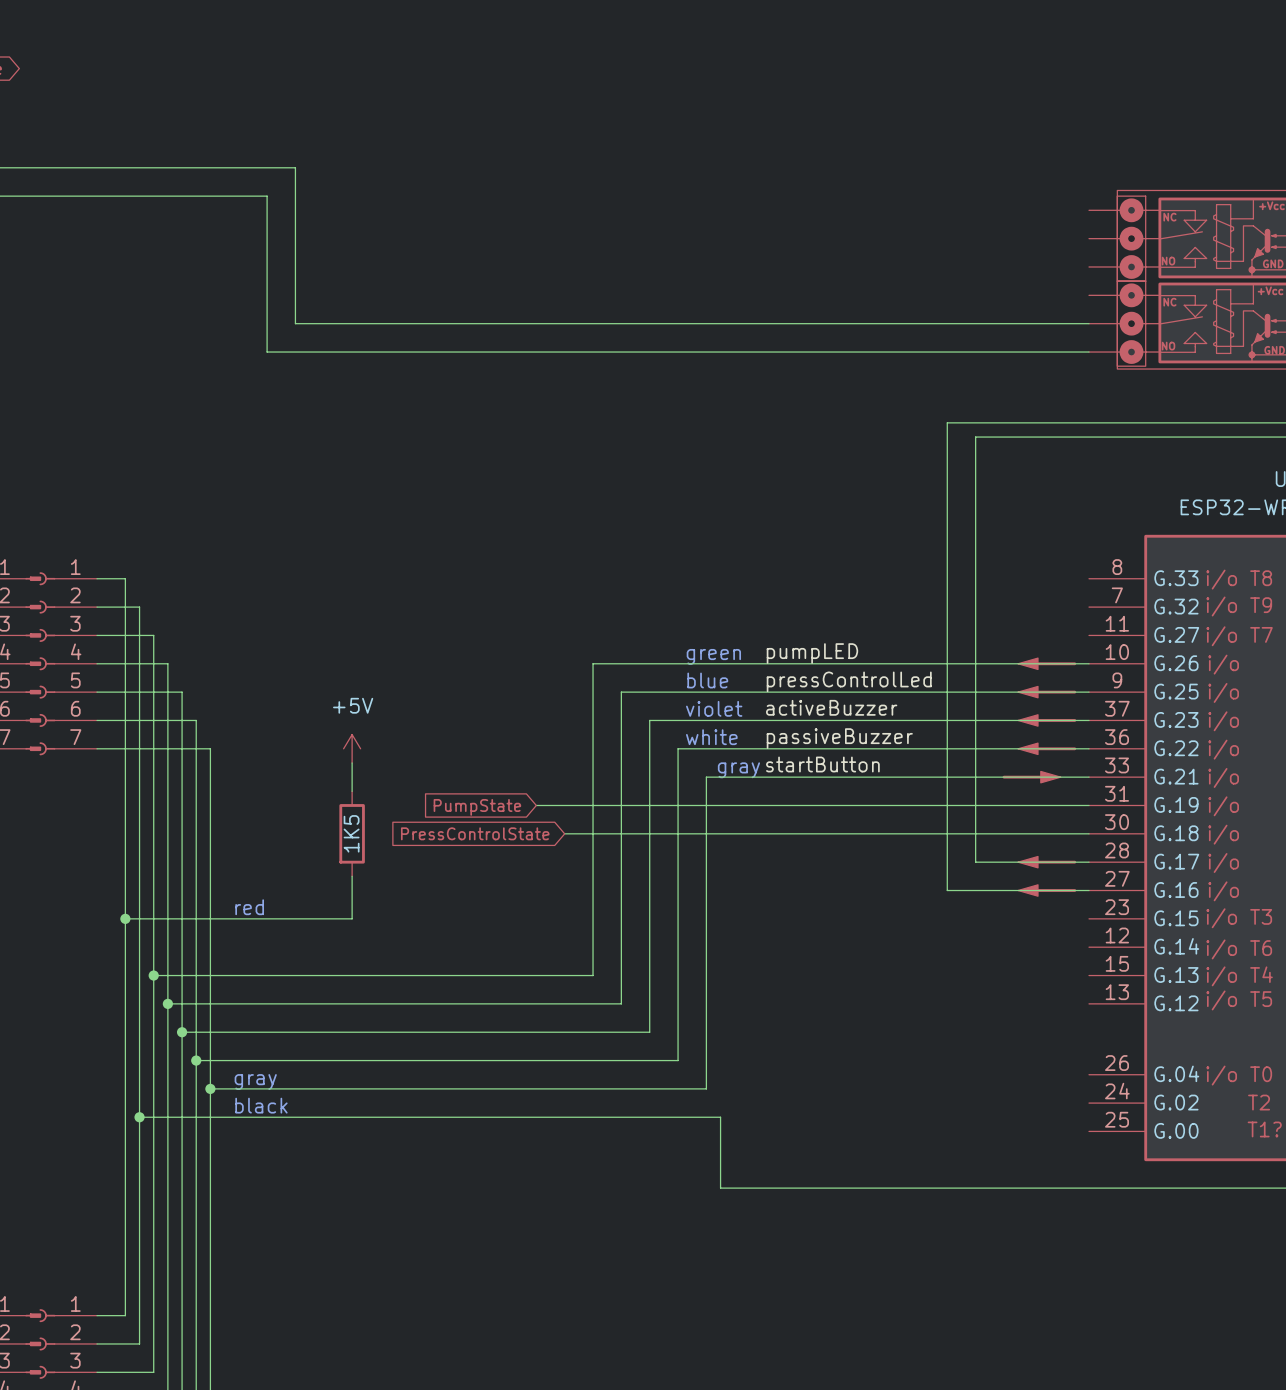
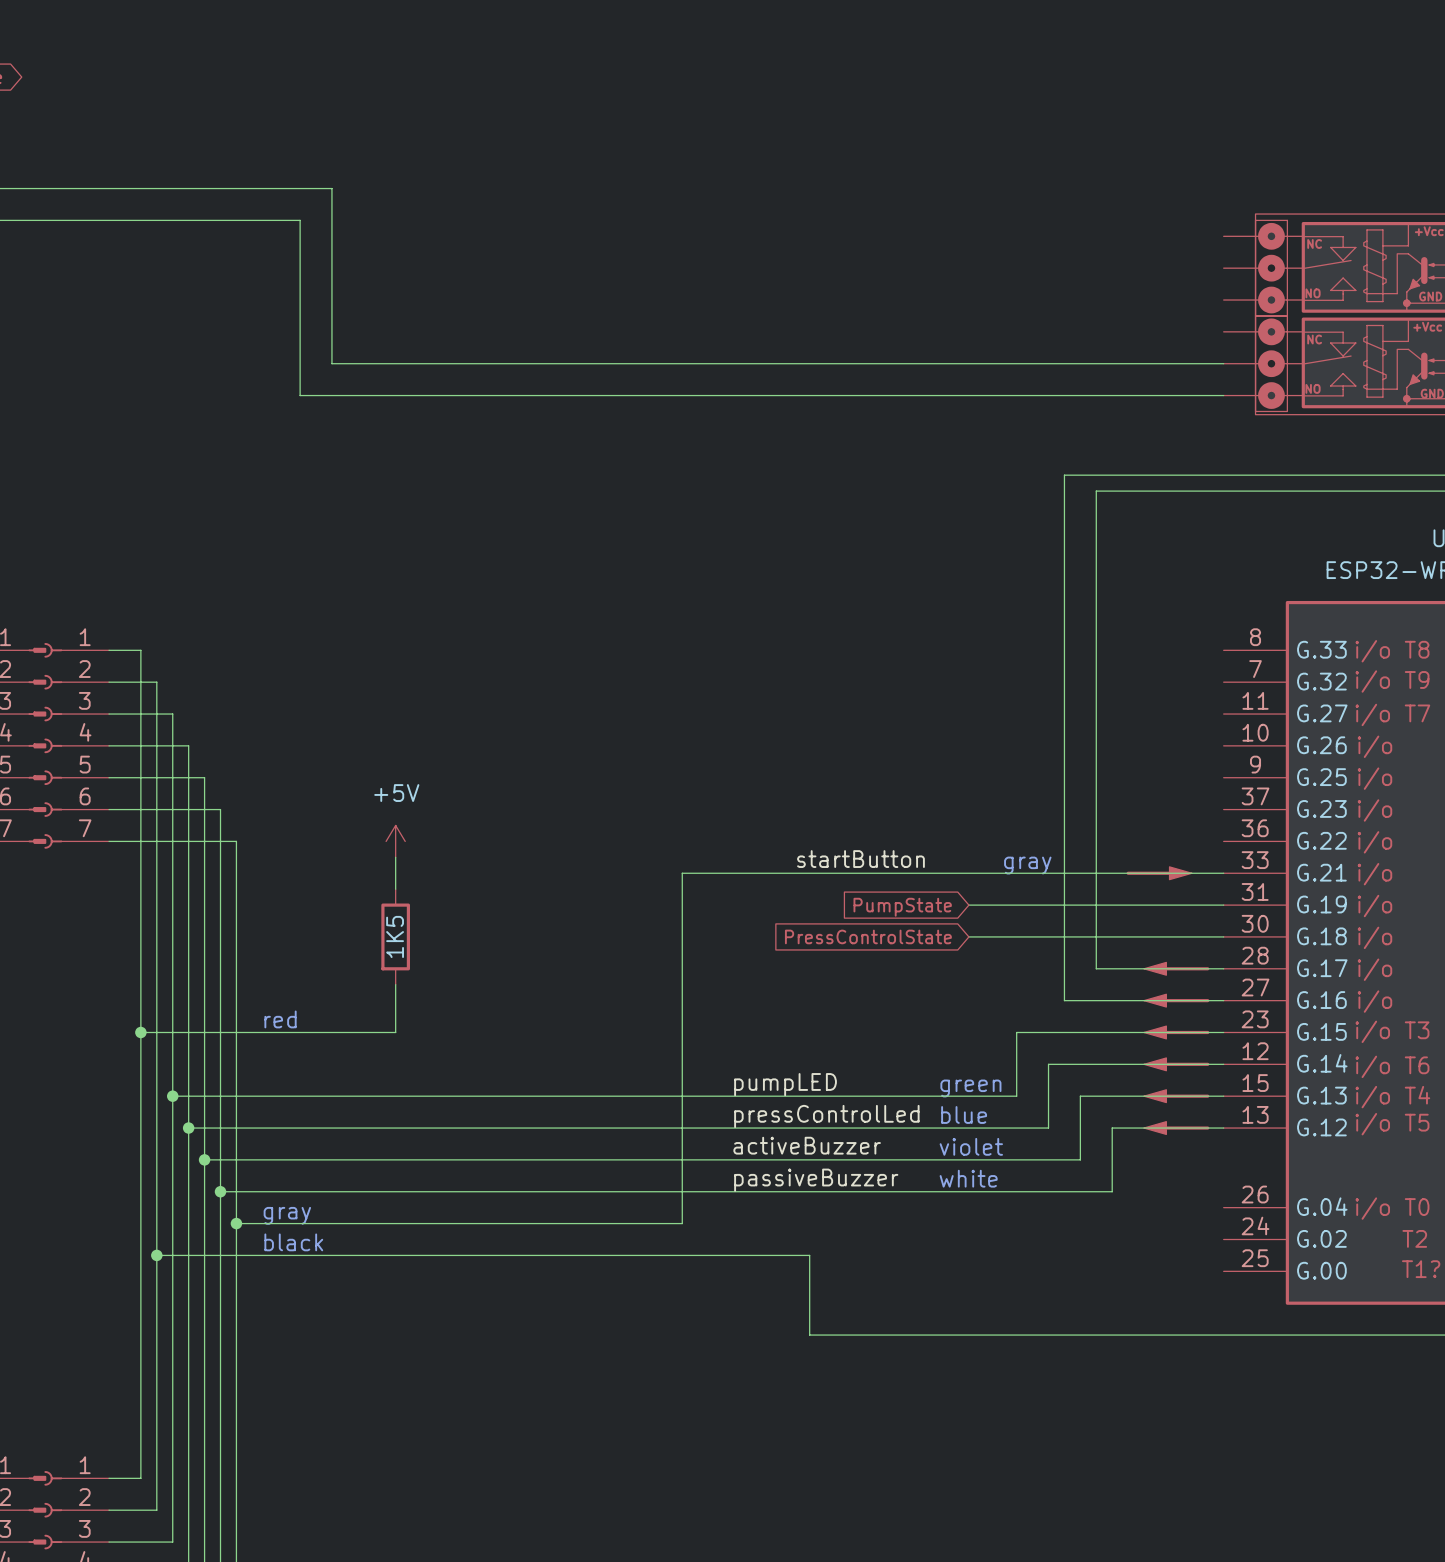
label: pumpLED (812, 653) -> none
text: green (713, 656) -> none
power symbol: (1047, 663) -> none
wire: (1089, 663) (593, 663) (593, 975) -> (1223, 1032) (1016, 1032) (1016, 1096) (666, 1096)
text: blue (707, 680) -> none
label: pressControlLed (849, 681) -> none
power symbol: (1047, 692) -> none
wire: (1089, 692) (621, 692) (621, 1003) -> (1223, 1064) (1048, 1064) (1048, 1128) (698, 1128)
label: activeBuzzer (831, 707) -> none
text: violet (714, 708) -> none
power symbol: (1047, 720) -> none
wire: (1089, 720) (649, 720) (649, 1032) -> (1223, 1096) (1080, 1096) (1080, 1159) (730, 1159)
text: white (711, 737) -> none
label: passiveBuzzer (839, 738) -> none
power symbol: (1047, 748) -> none
wire: (1089, 748) (678, 748) (678, 1060) -> (1223, 1128) (1112, 1128) (1112, 1191) (761, 1191)
label position: startButton (822, 764) -> startButton (860, 859)
text position: gray (738, 770) -> gray (1027, 865)
wire: (706, 777) (706, 1088) (607, 1088) -> (793, 873) (682, 873) (682, 1223)
wire: (536, 805) (862, 805) -> none
global label: PumpState (477, 807) -> none
global label: none -> PumpState (902, 907)
global label: PressControlState (475, 833) -> none
wire: (564, 833) (862, 833) -> none
global label: none -> PressControlState (868, 936)
power symbol: none -> (1176, 1032)
power symbol: none -> (1176, 1064)
label: none -> pumpLED (785, 1084)
text: none -> green (970, 1088)
power symbol: none -> (1176, 1096)
text: none -> blue (964, 1114)
label: none -> pressControlLed (826, 1116)
power symbol: none -> (1176, 1128)
label: none -> activeBuzzer (807, 1145)
text: none -> violet (971, 1146)
text: none -> white (968, 1178)
label: none -> passiveBuzzer (816, 1180)

